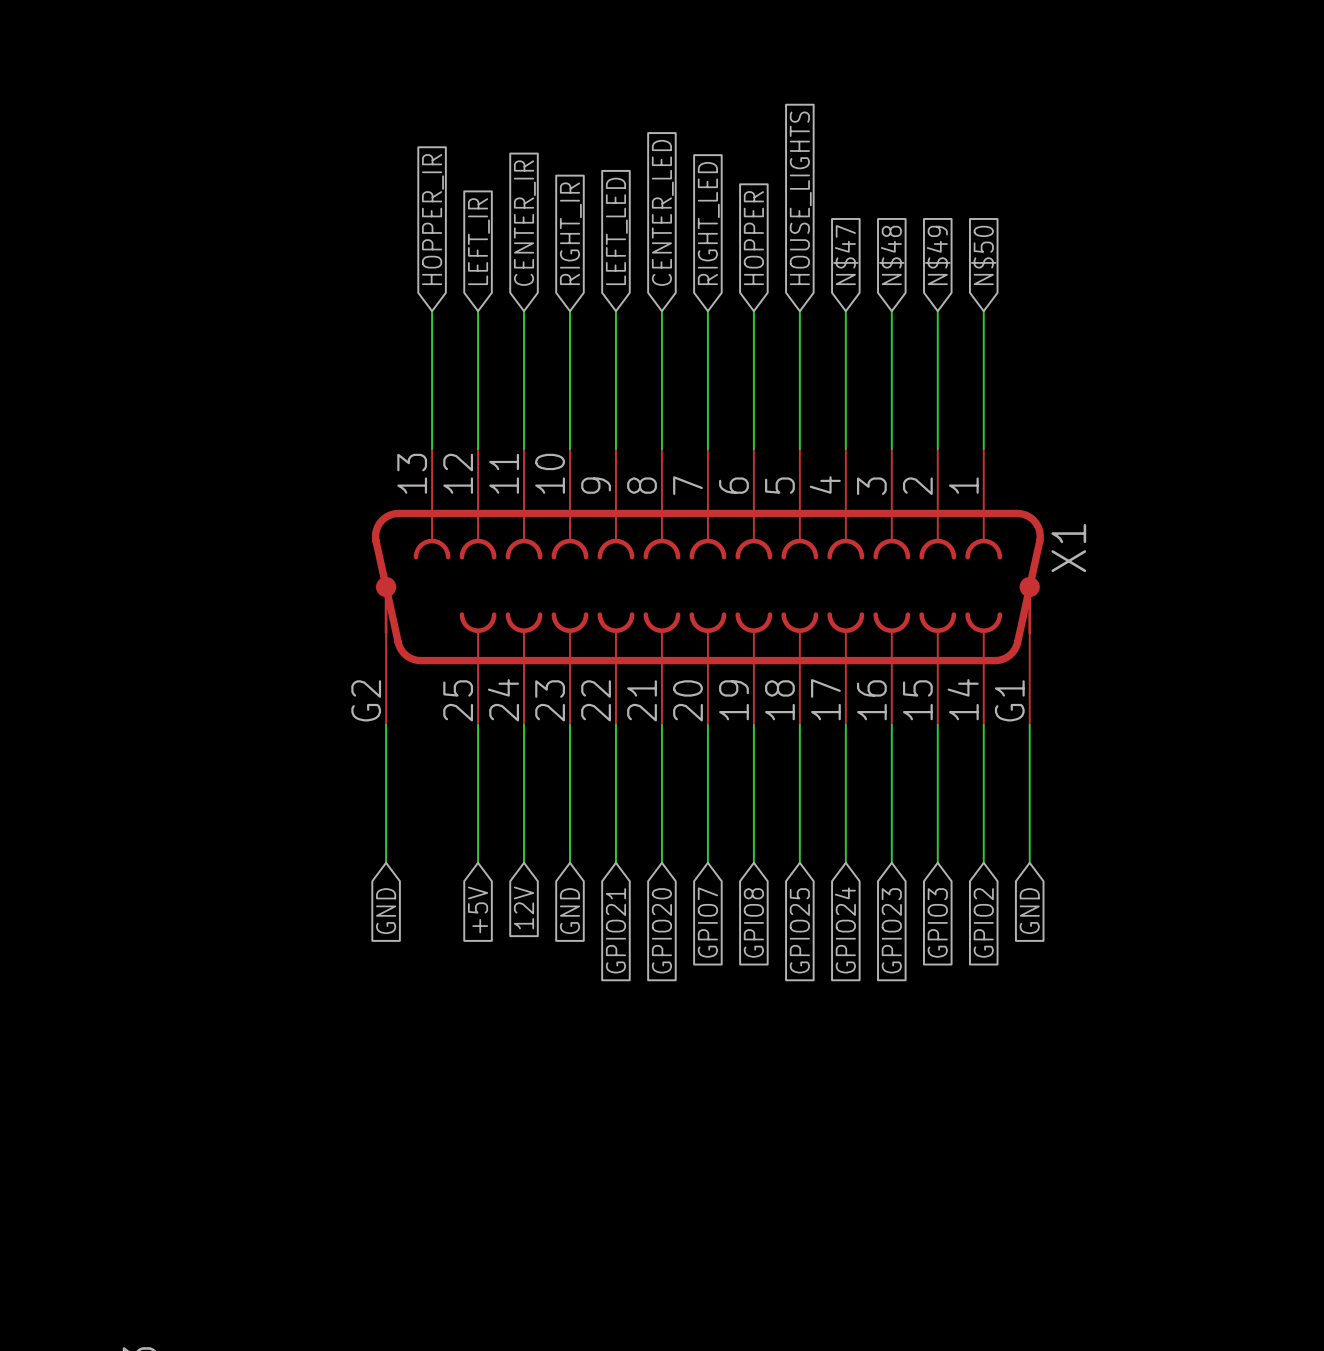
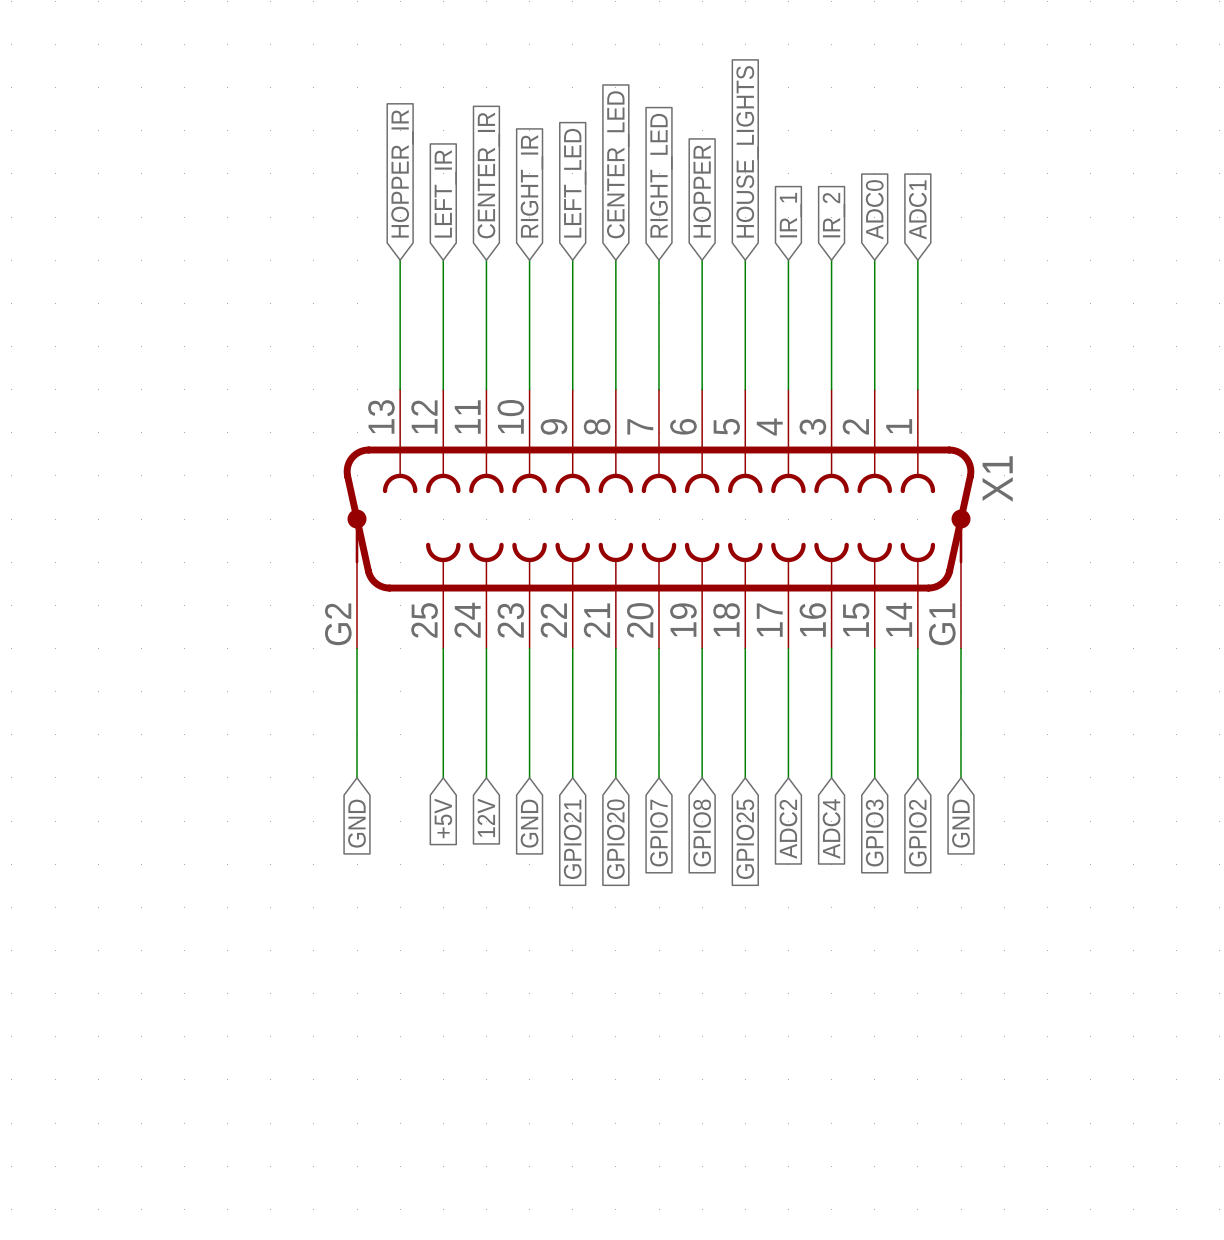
global label: N$47 (845, 255) -> IR_1 (790, 215)
global label: N$48 (891, 255) -> IR_2 (833, 215)
global label: N$49 (937, 255) -> ADC0 (874, 209)
global label: N$50 (983, 255) -> ADC1 (917, 209)
global label: GPIO24 (845, 930) -> ADC2 (788, 829)
global label: GPIO23 (891, 930) -> ADC4 (831, 829)

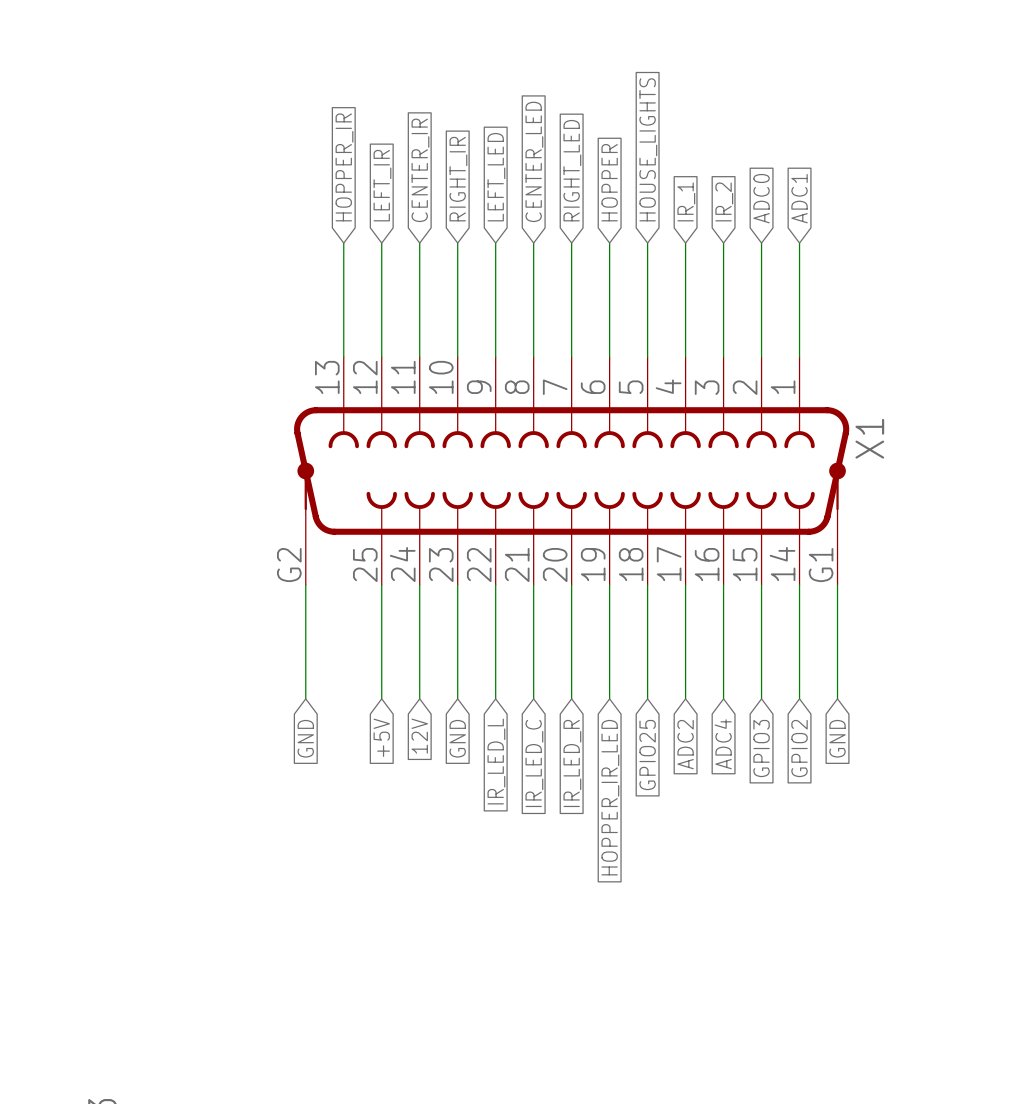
global label: GPIO7 (658, 833) -> IR_LED_R (572, 763)
global label: GPIO8 (702, 833) -> HOPPER_IR_LED (610, 797)
global label: GPIO21 (572, 839) -> IR_LED_L (496, 761)
global label: GPIO20 (615, 839) -> IR_LED_C (534, 763)

